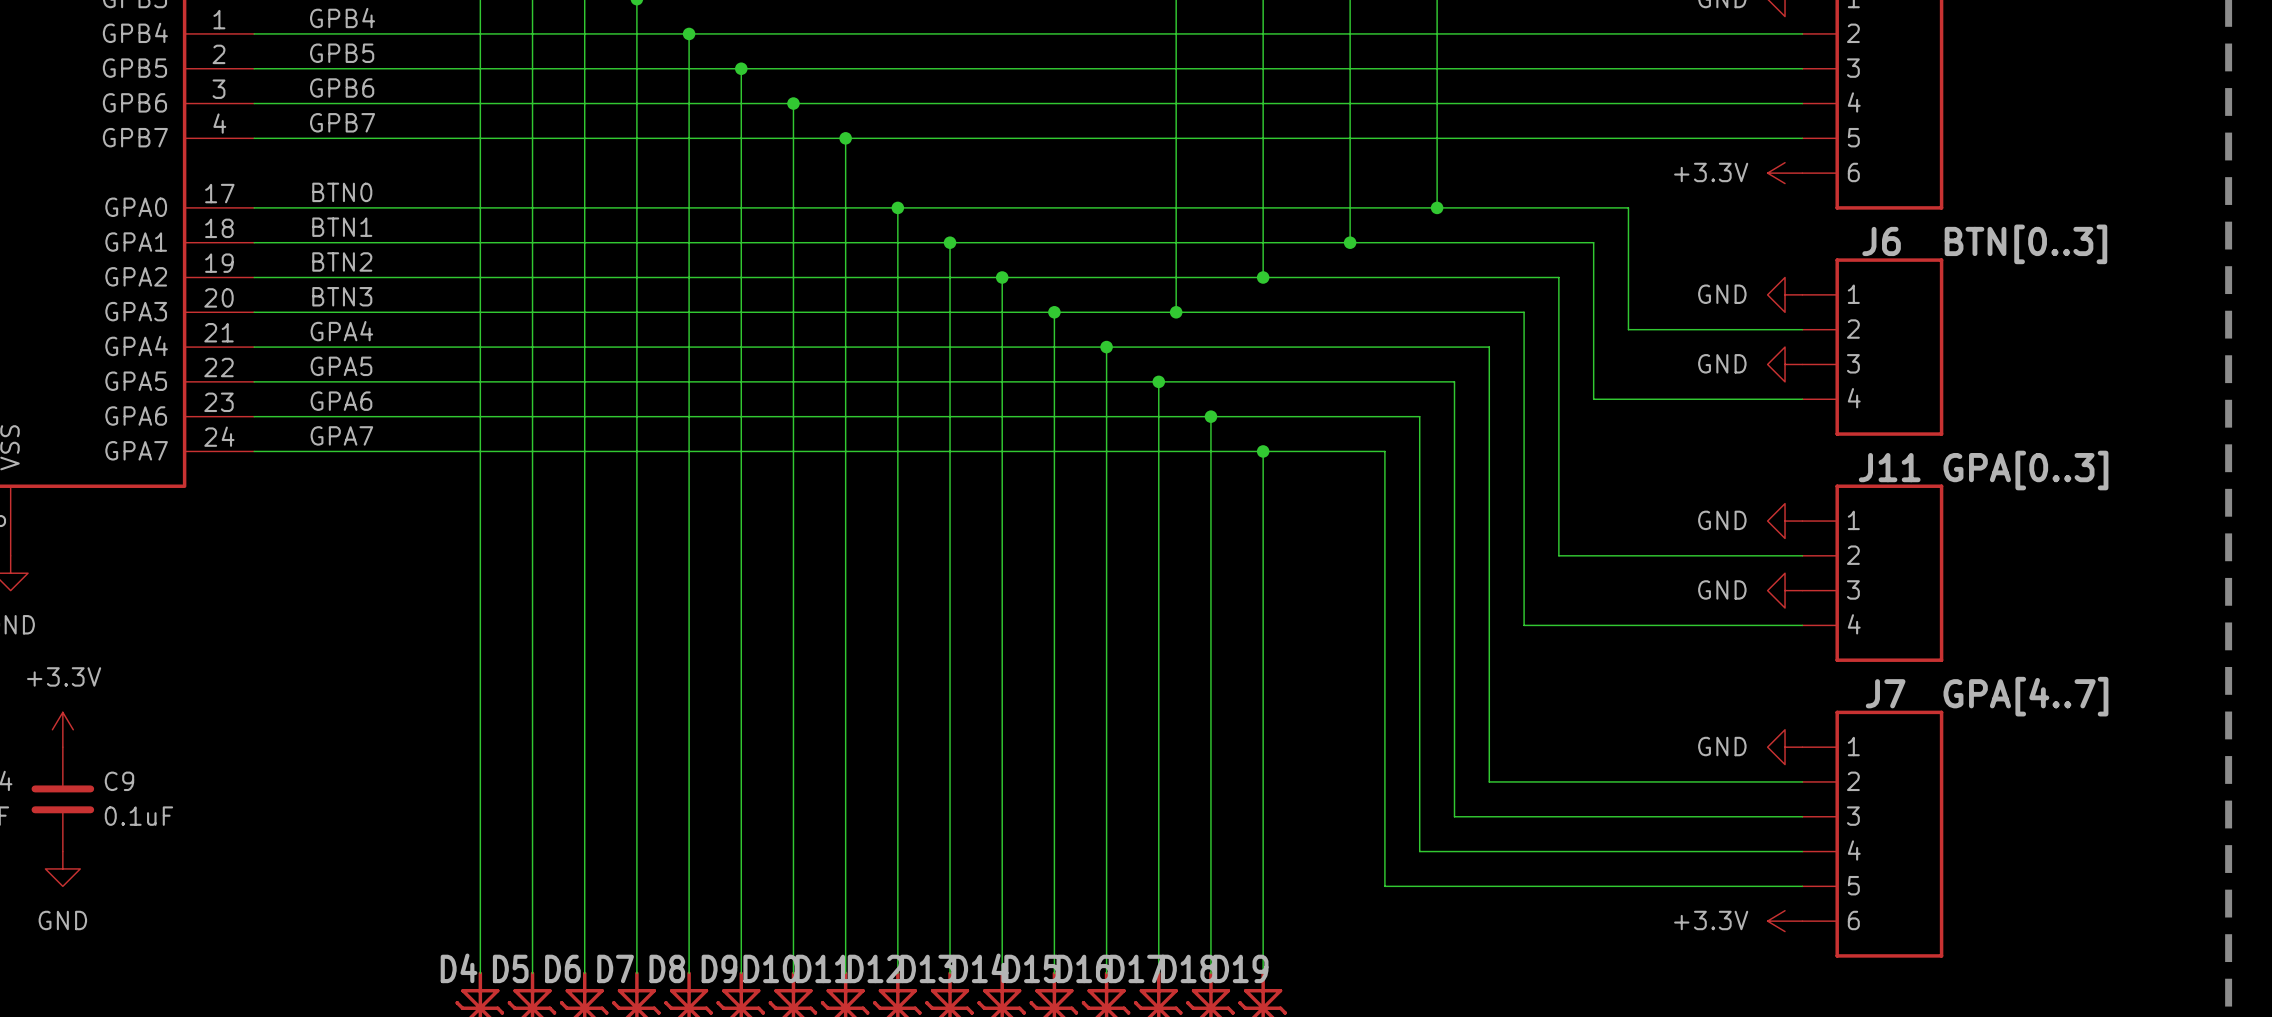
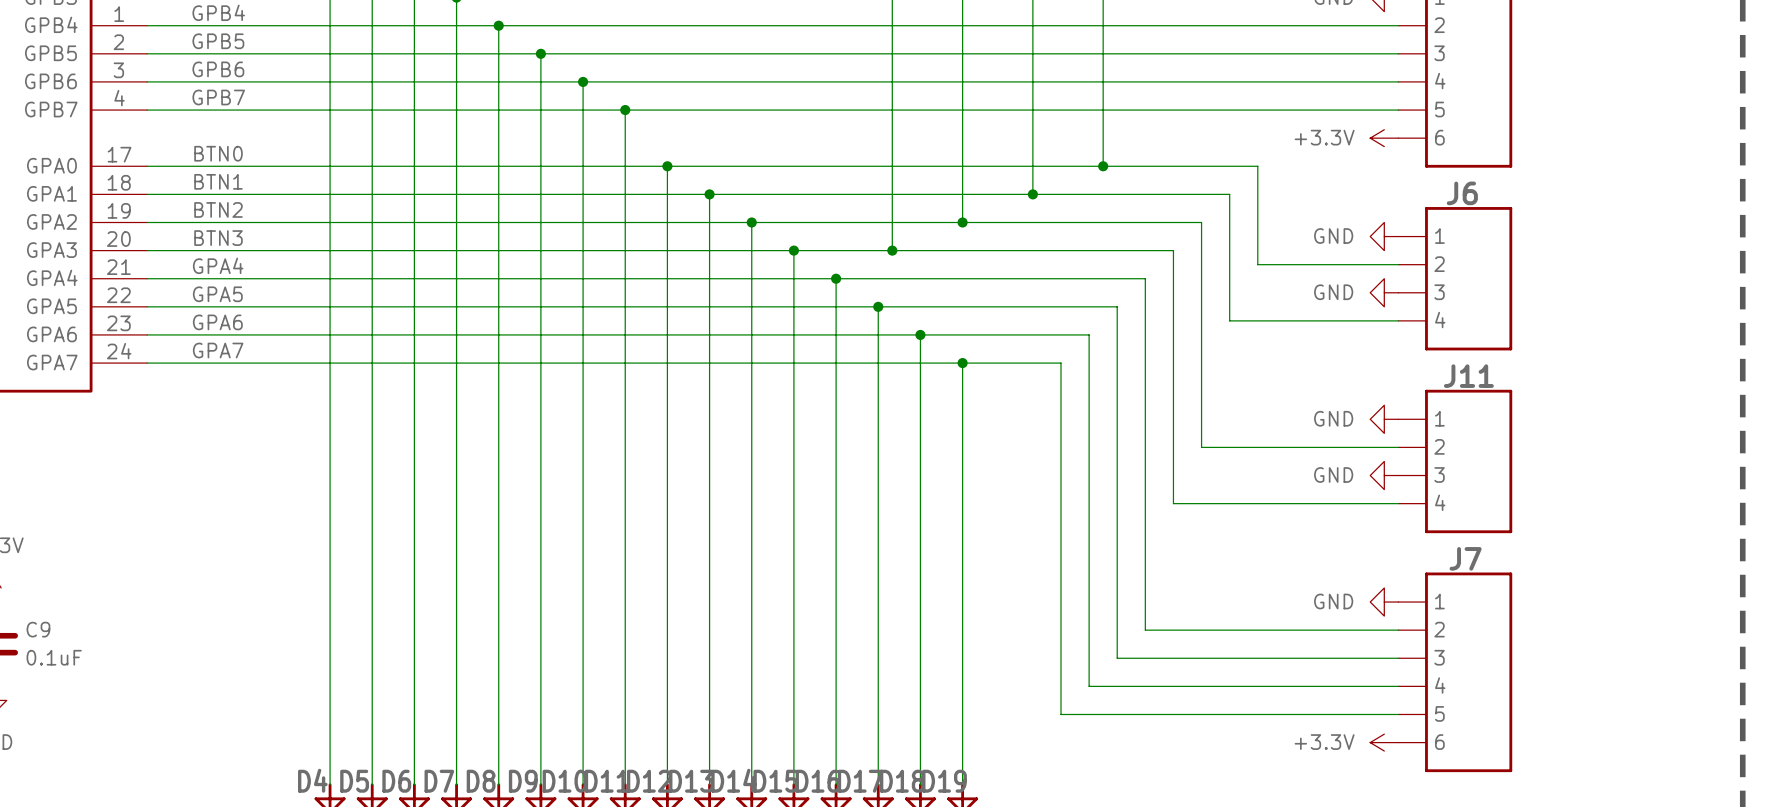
J6 value: BTN[0..3] (2025, 244) -> none
J11 value: GPA[0..3] (2025, 470) -> none
J7 value: GPA[4..7] (2025, 696) -> none

